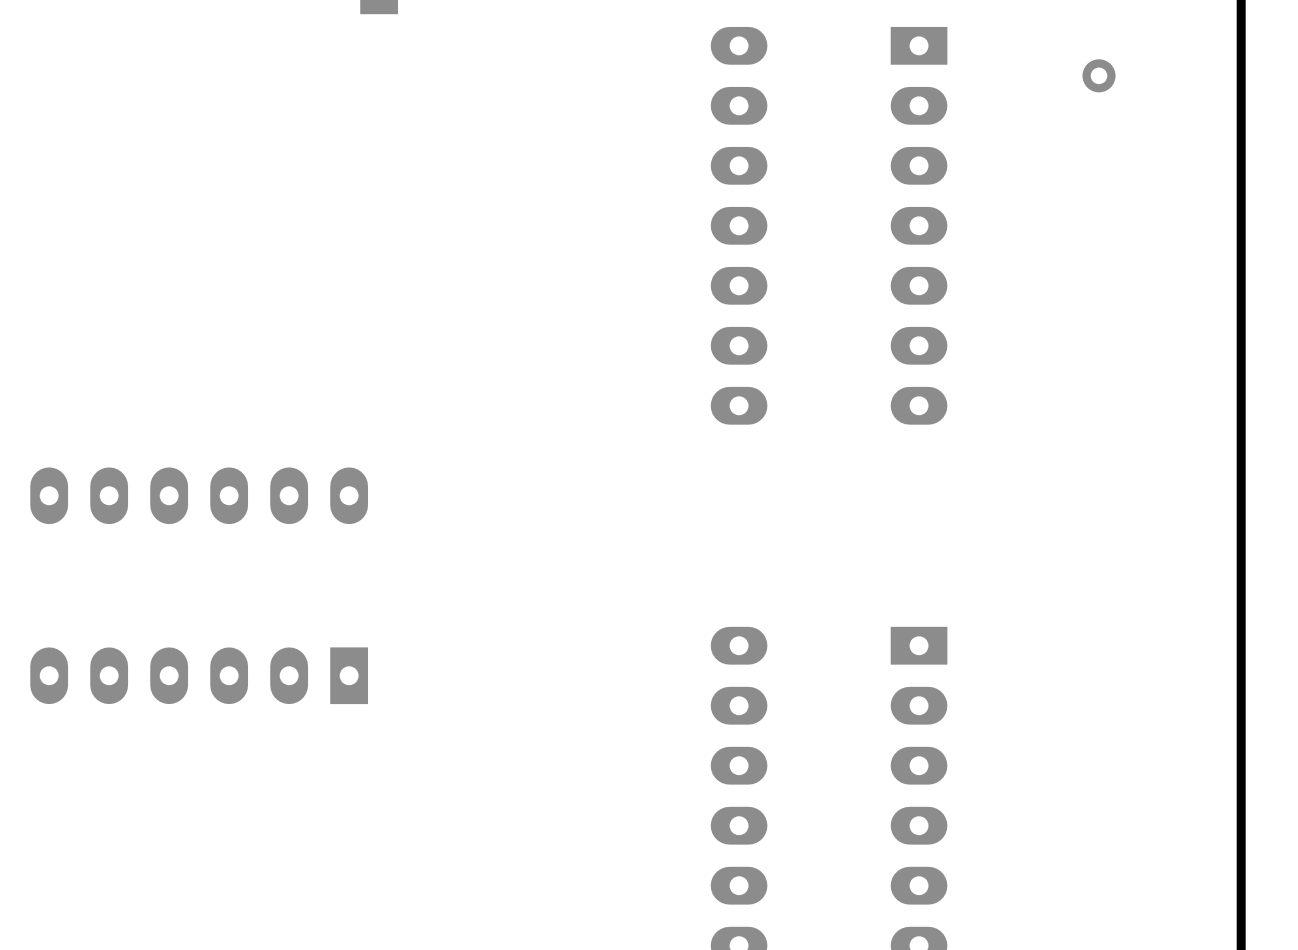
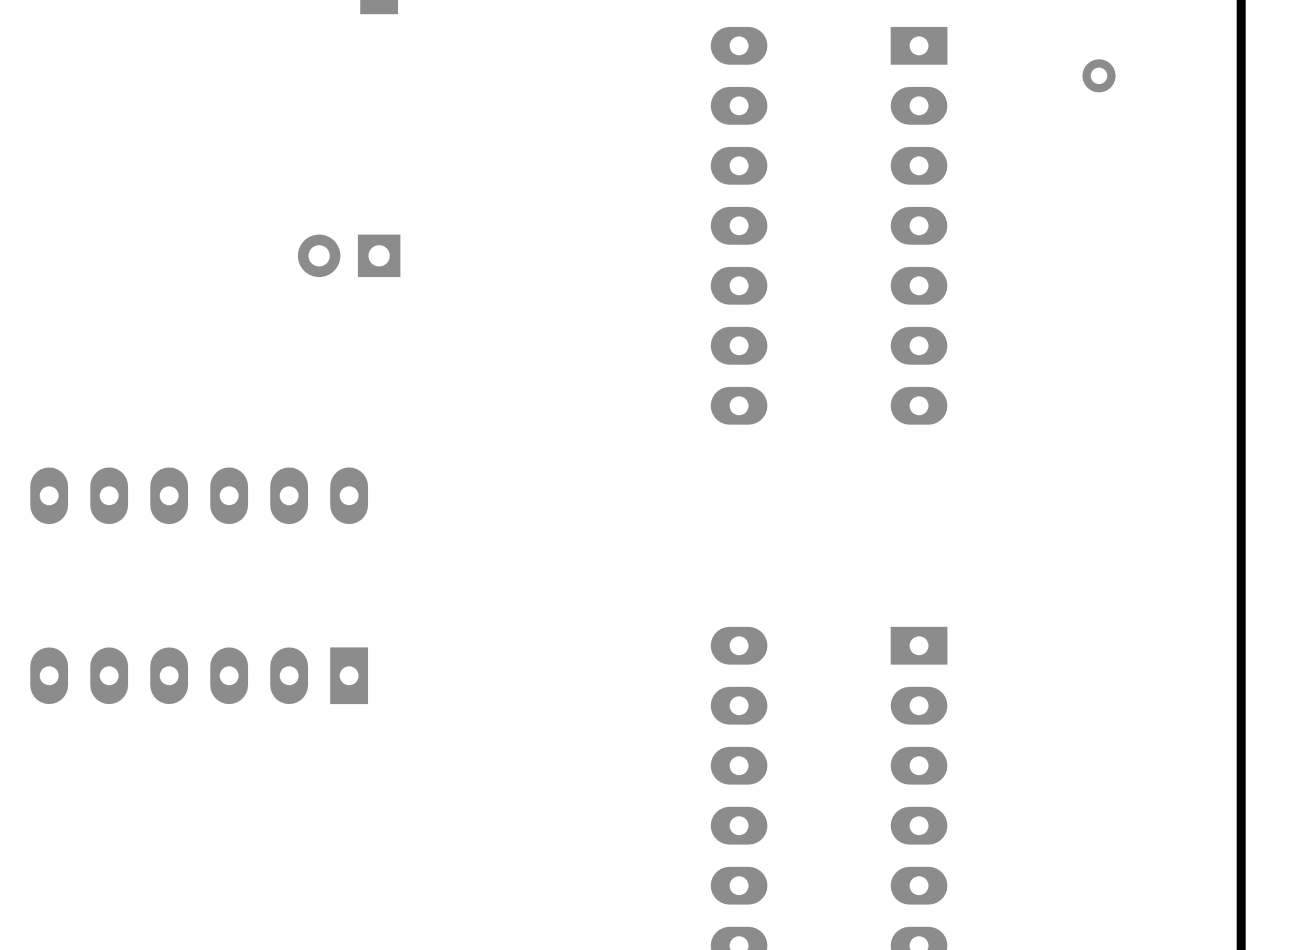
part: none -> (349, 255)

